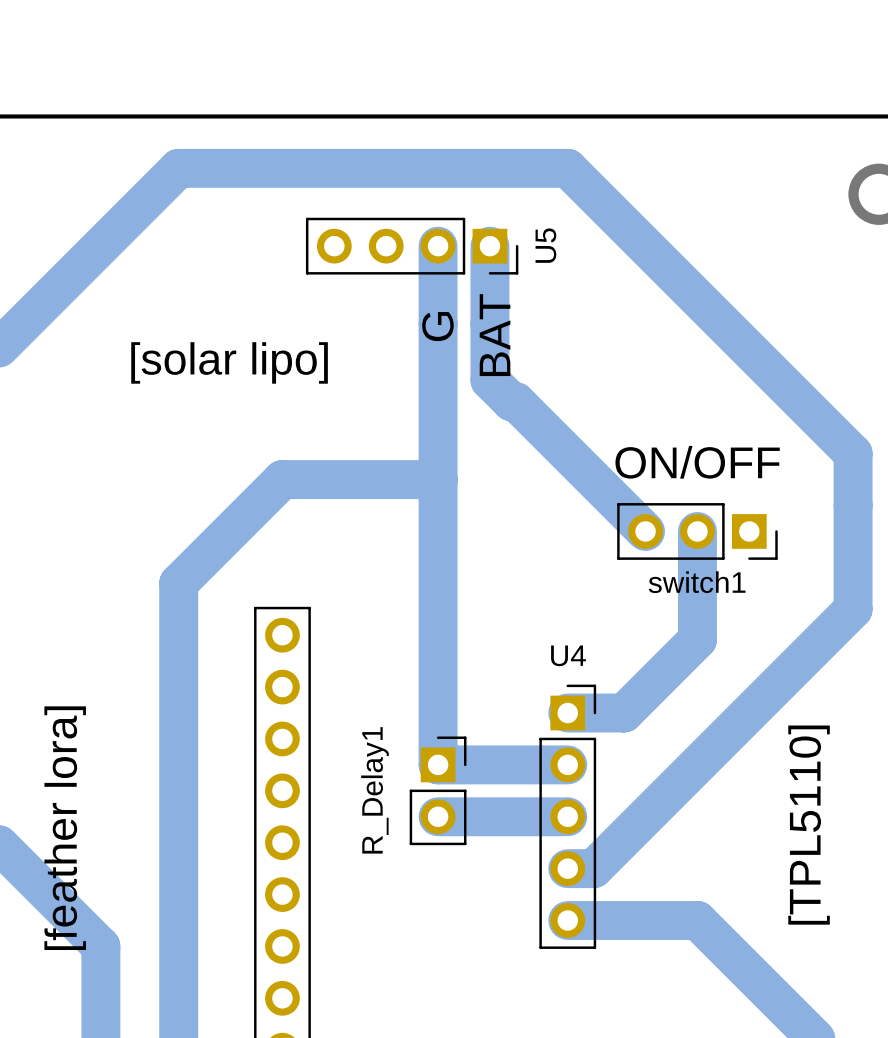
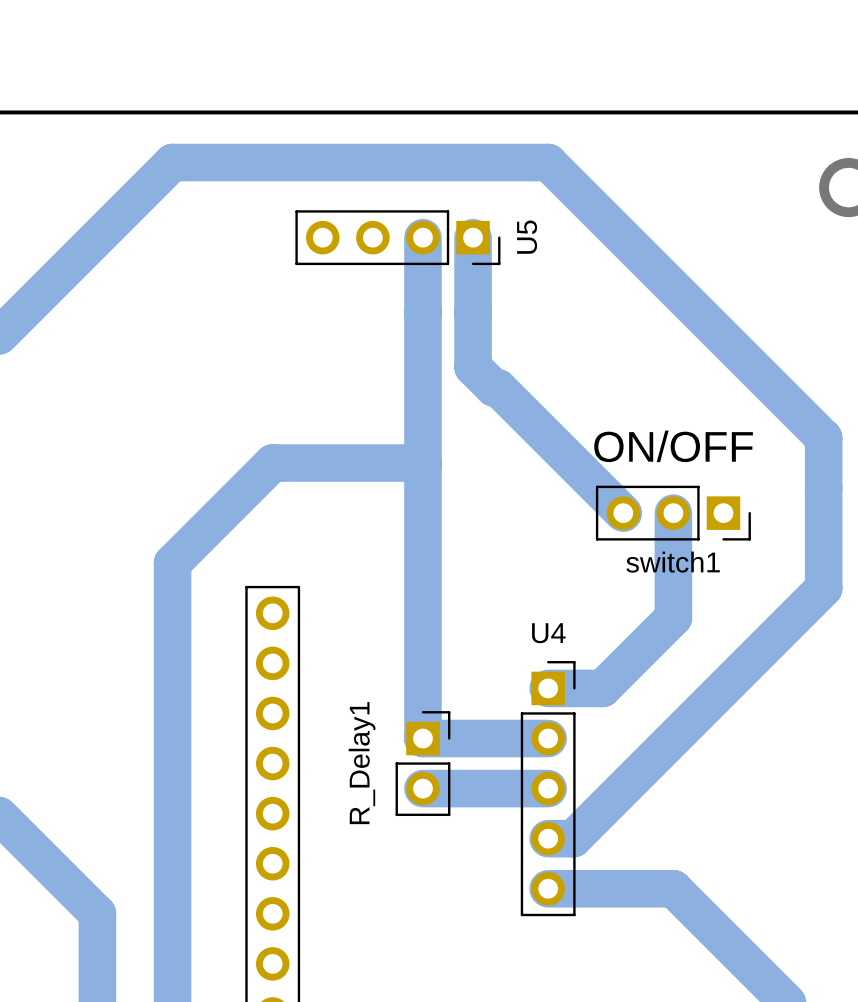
text: G (437, 326) -> none
text: BAT (495, 335) -> none
text: [solar lipo] (229, 362) -> none
text: [TPL5110] (809, 825) -> none
text: [feather lora] (65, 828) -> none

